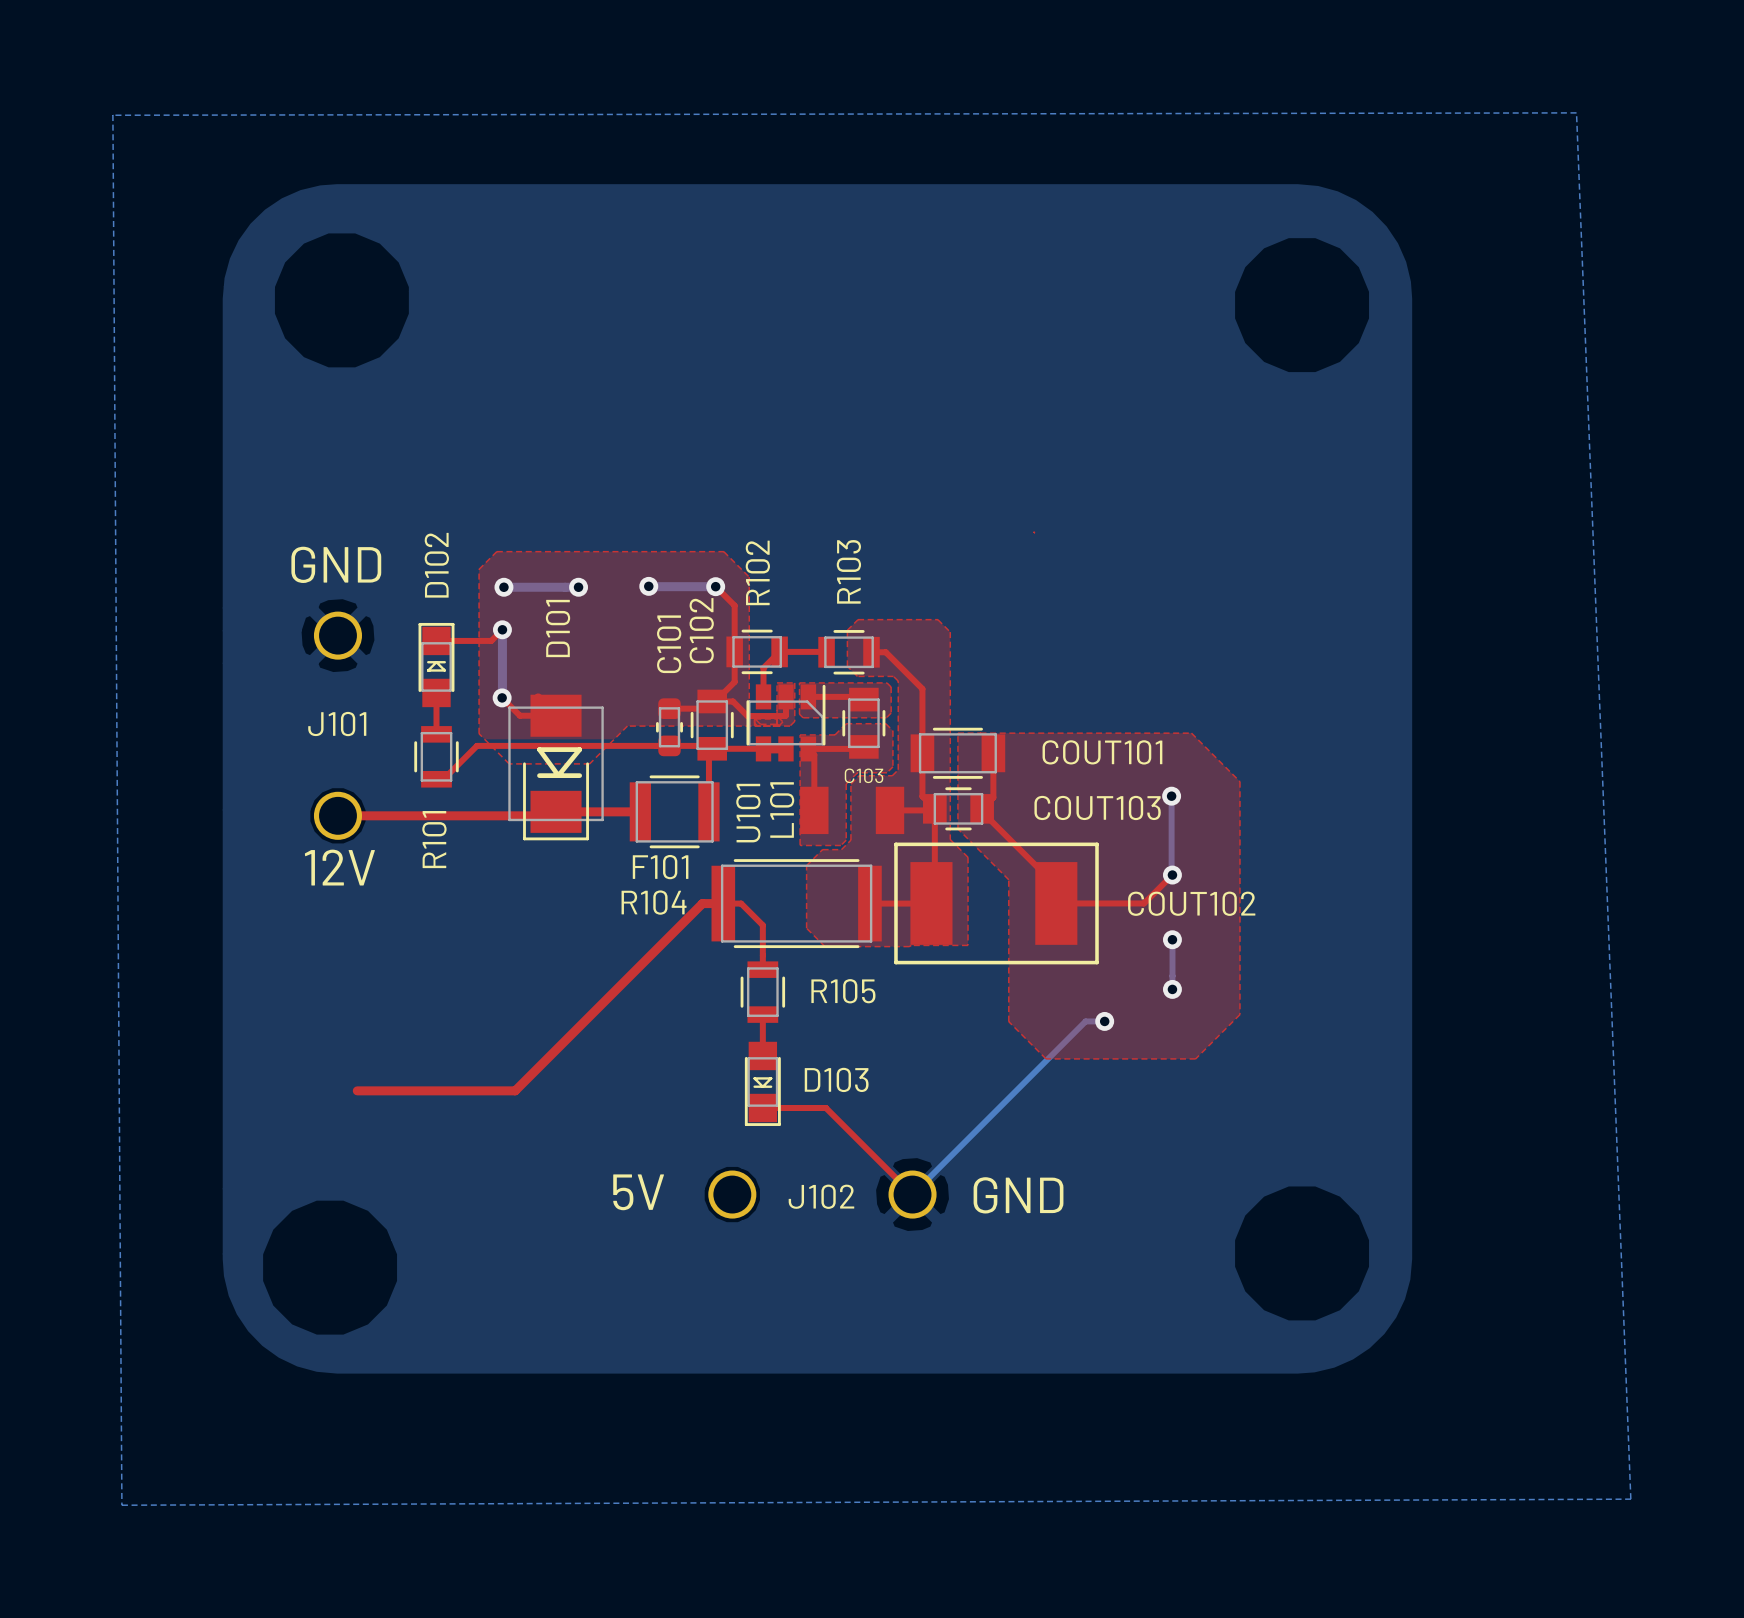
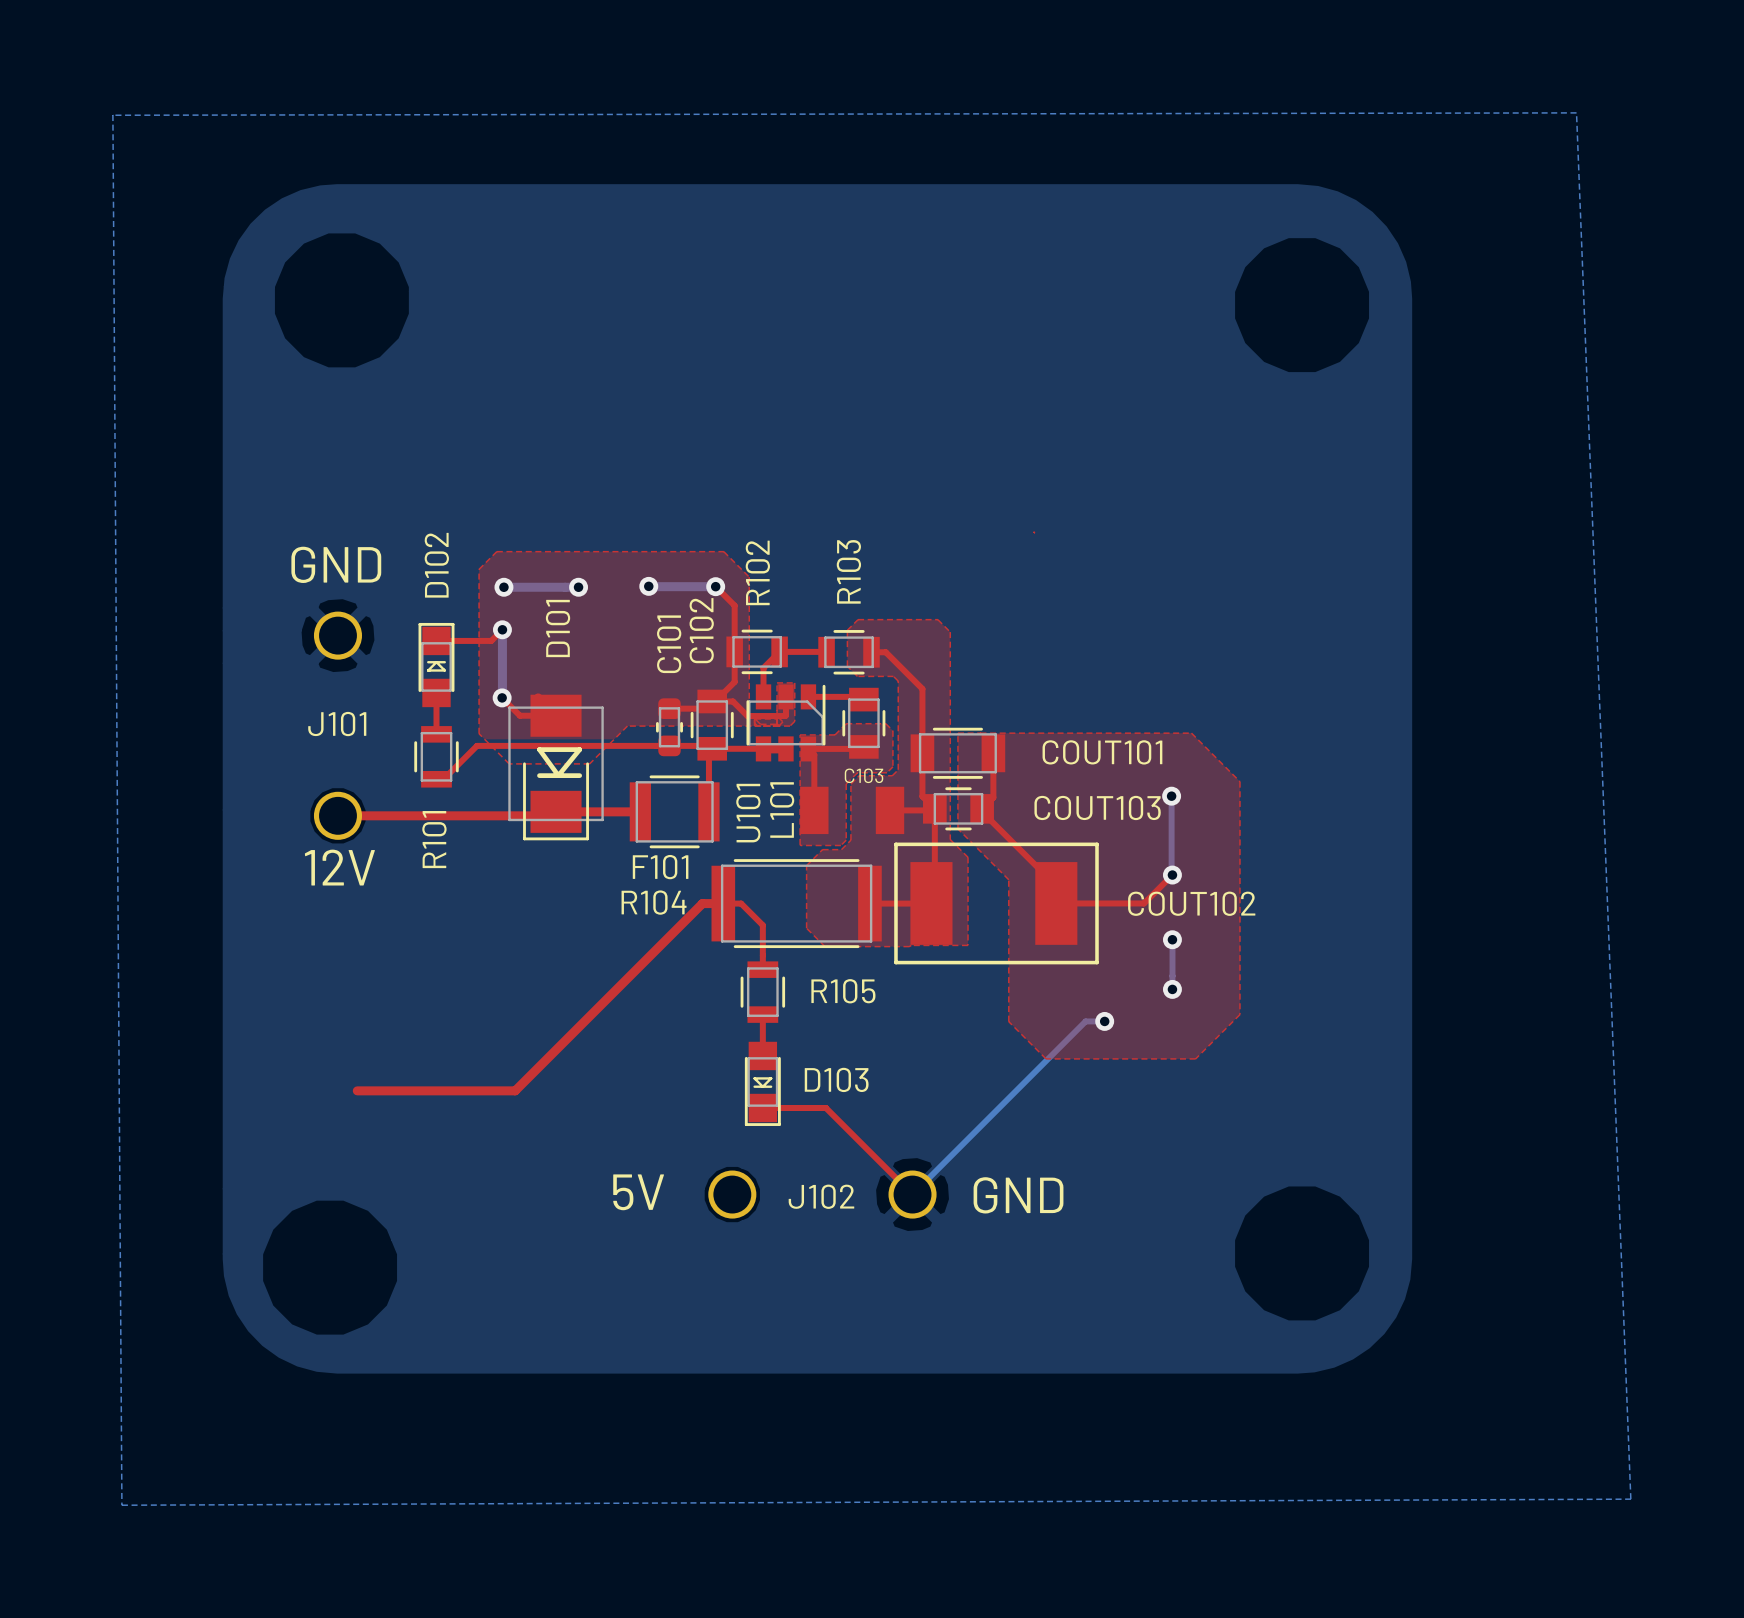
top zone outline: (799, 682) (887, 682) (891, 687) (891, 713) (886, 717) (803, 717) (799, 714) (799, 682) -> none

